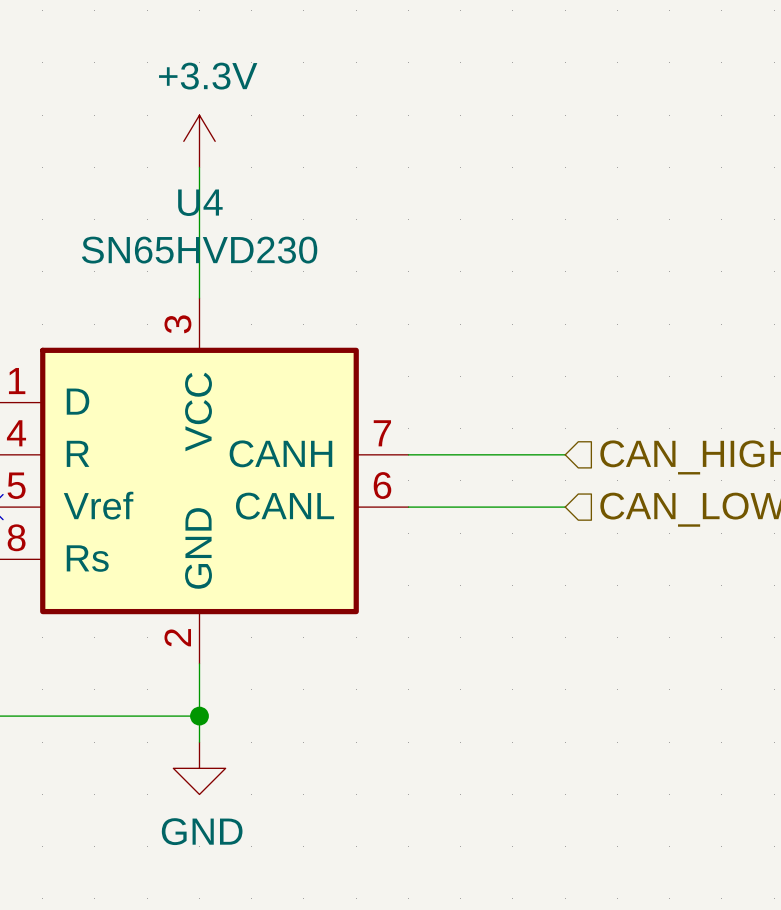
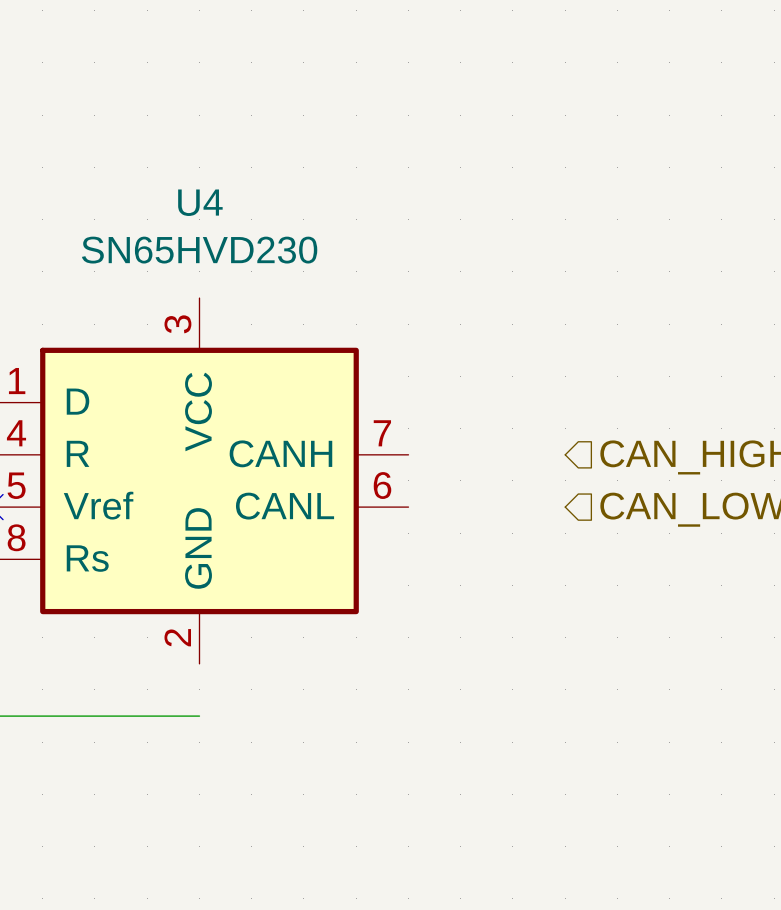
power symbol: +3.3V (199, 141) -> none
wire: (199, 167) (199, 298) -> none
wire: (408, 454) (565, 454) -> none
wire: (408, 507) (565, 507) -> none
wire: (199, 663) (199, 742) -> none
junction: (199, 716) -> none
power symbol: GND (199, 768) -> none

